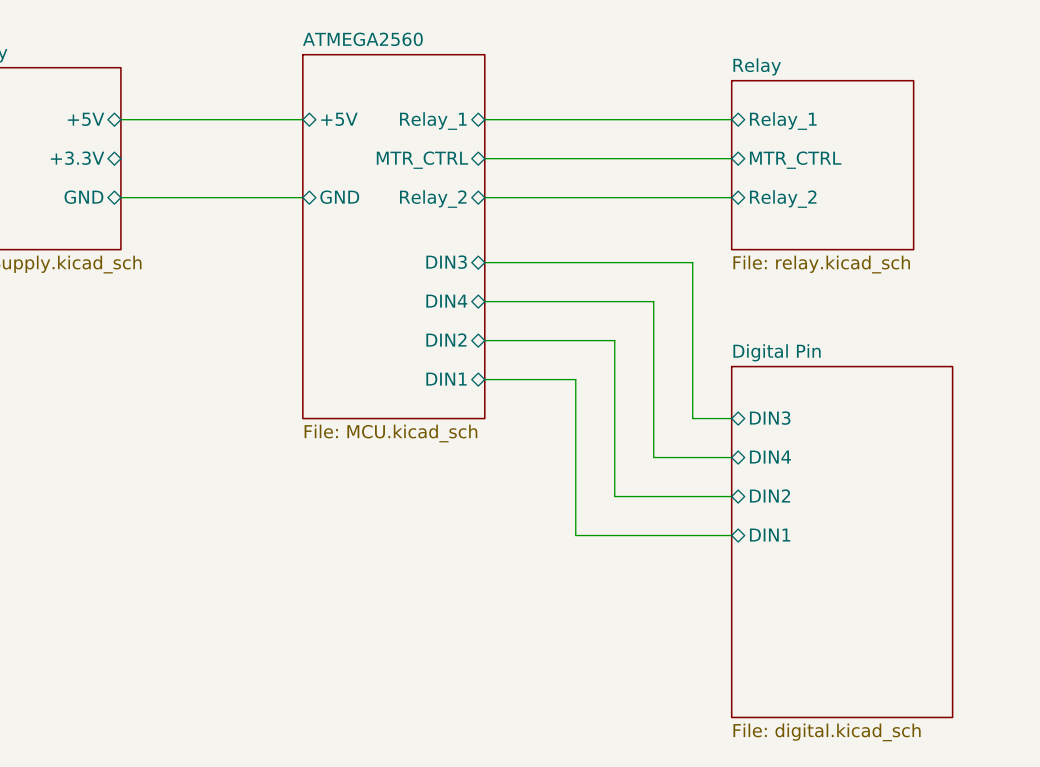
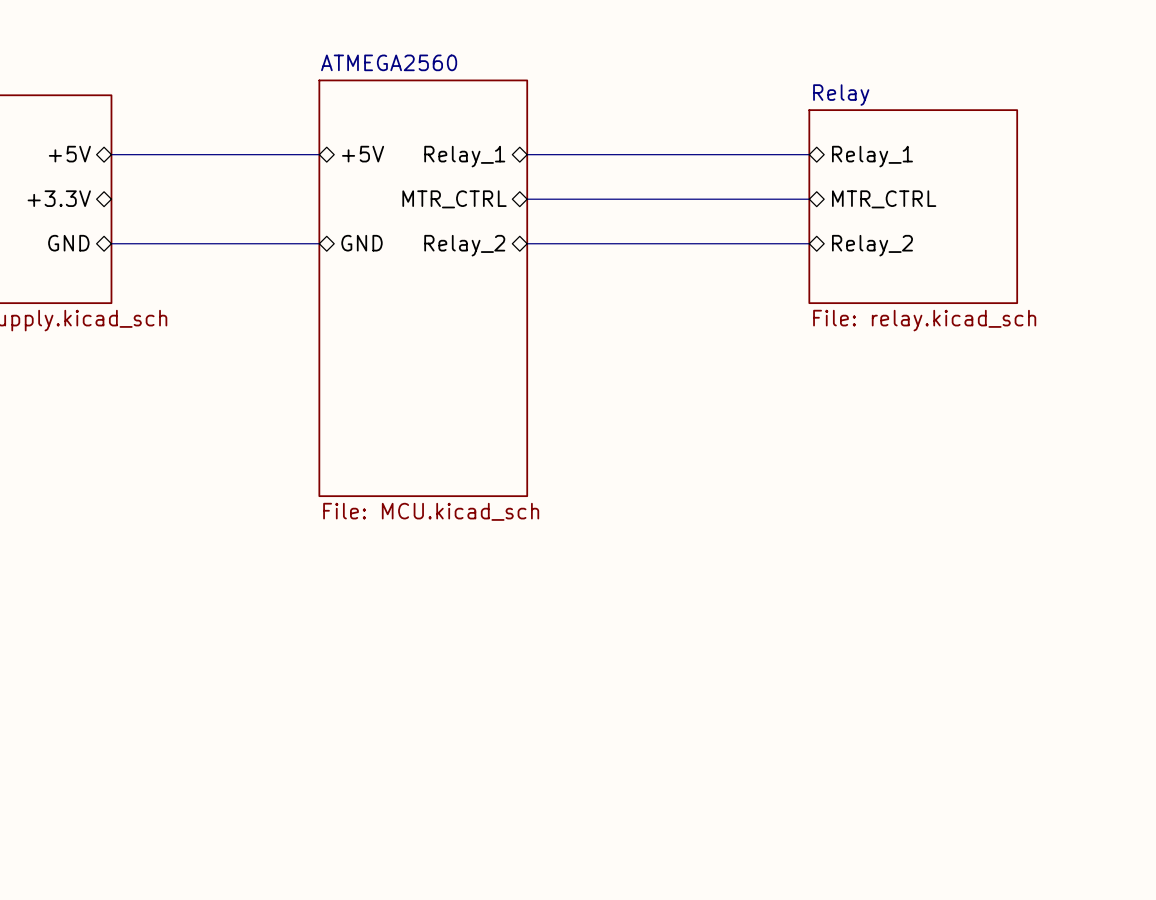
sheet pin: DIN3 (446, 262) -> none
wire: (484, 262) (692, 262) (692, 418) (731, 418) -> none
sheet pin: DIN4 (446, 301) -> none
wire: (484, 301) (653, 301) (653, 457) (731, 457) -> none
sheet pin: DIN2 (446, 340) -> none
wire: (484, 340) (614, 340) (614, 496) (731, 496) -> none
sheet pin: DIN1 (446, 379) -> none
wire: (484, 379) (575, 379) (575, 535) (731, 535) -> none
sheet pin: DIN3 (770, 418) -> none
sheet pin: DIN4 (770, 457) -> none
sheet pin: DIN2 (770, 495) -> none
sheet pin: DIN1 (770, 535) -> none
sheet Digital Pin: File: digital.kicad_sch (842, 542) -> none

